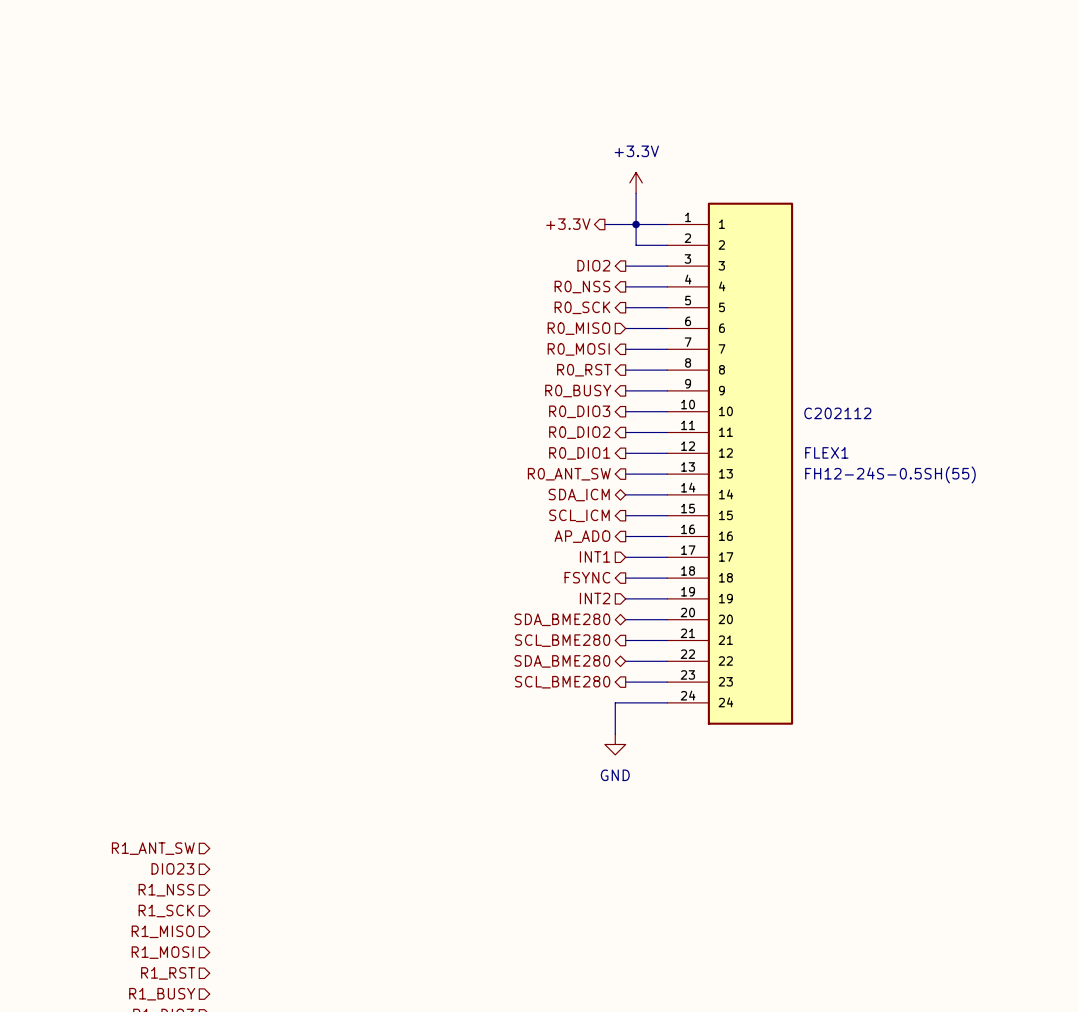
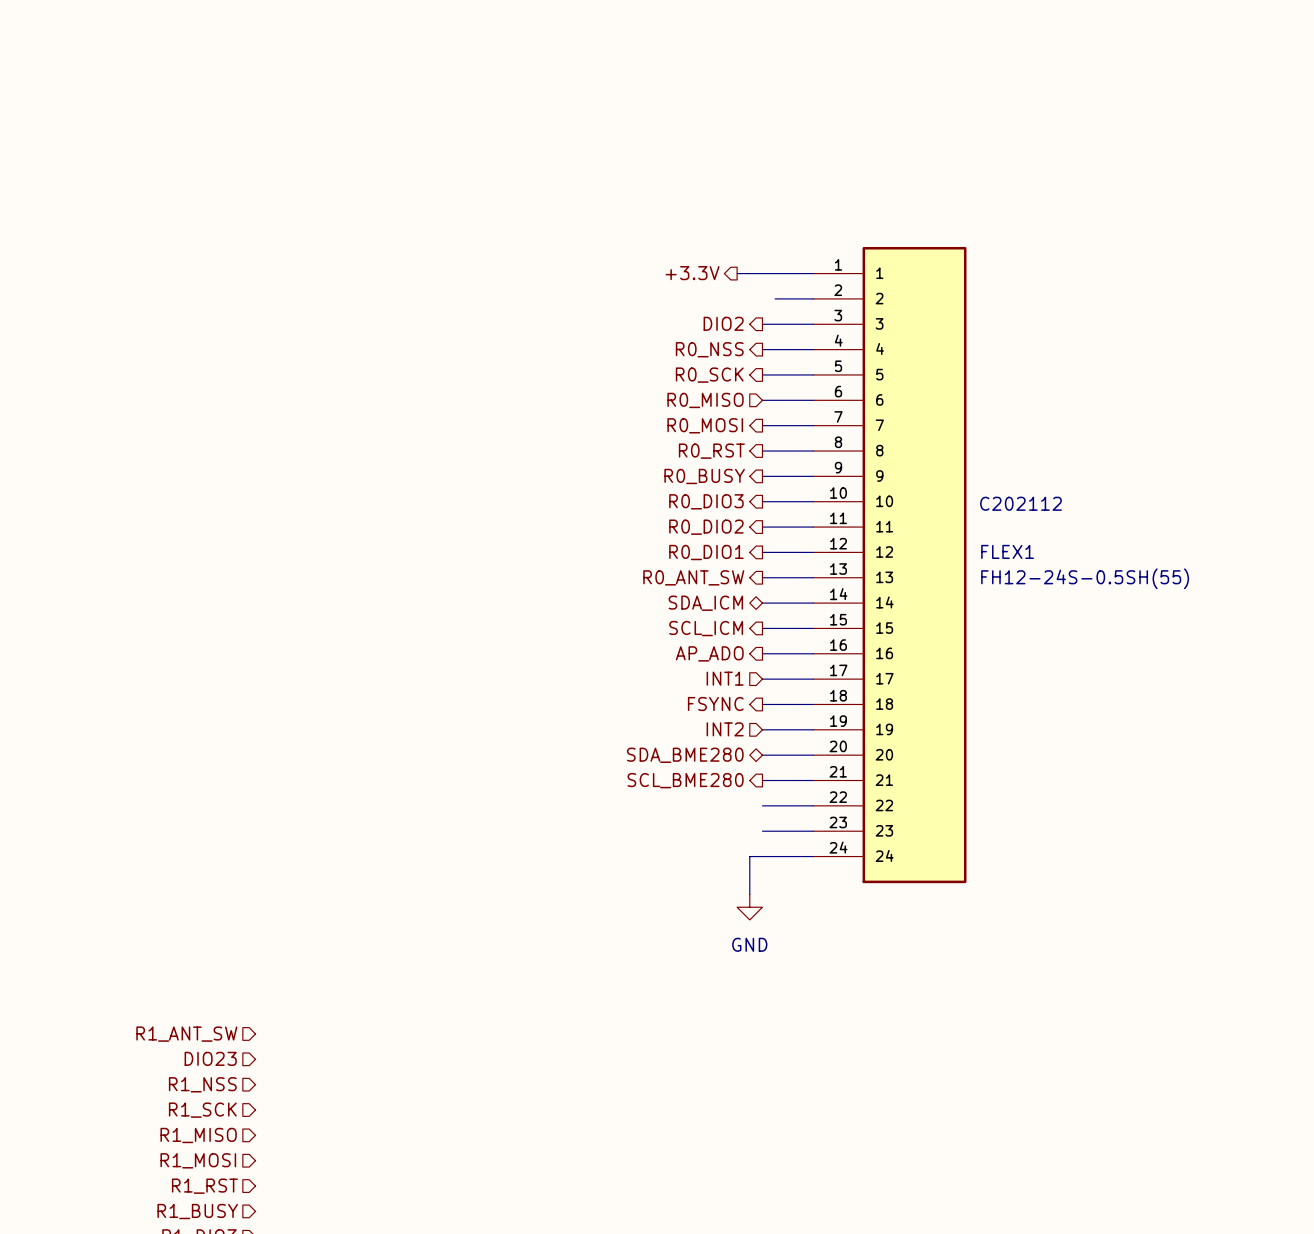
power symbol: +3.3V (636, 182) -> none
wire: (636, 193) (636, 245) -> none
junction: (636, 224) -> none
hierarchical label: SDA_BME280 (562, 661) -> none
hierarchical label: SCL_BME280 (562, 682) -> none

